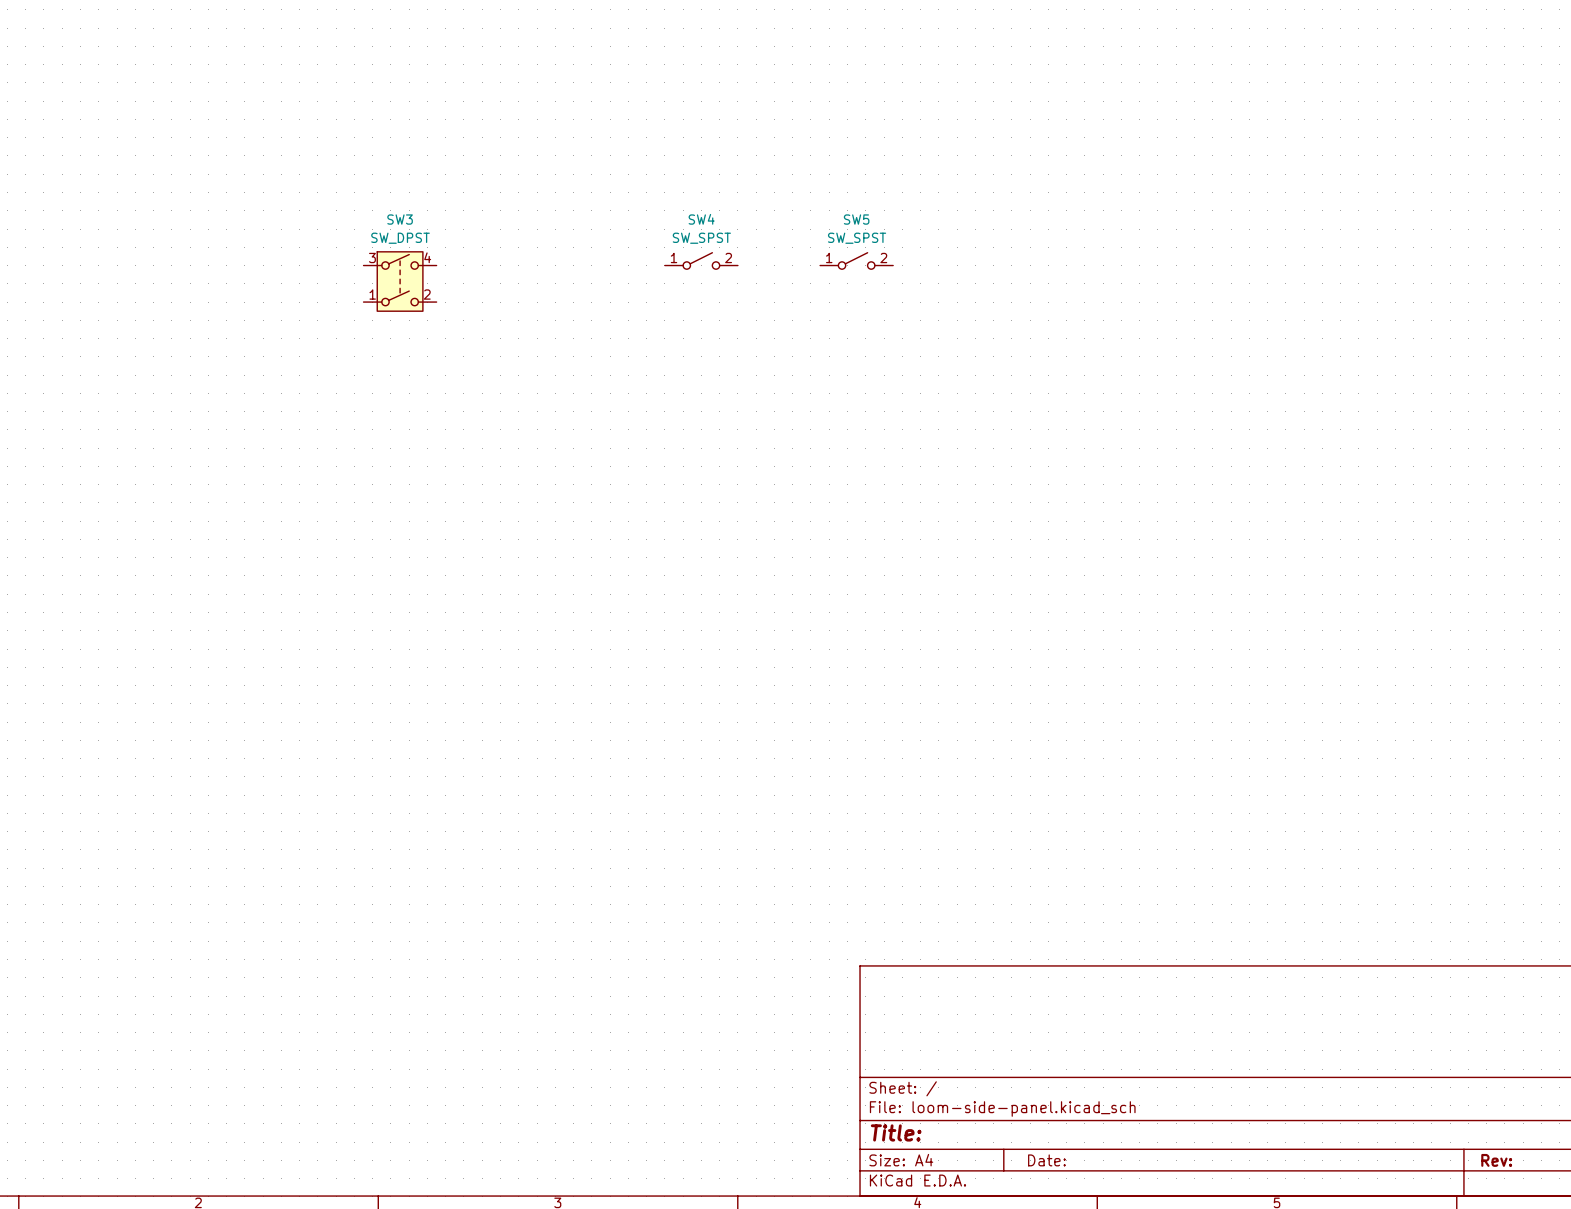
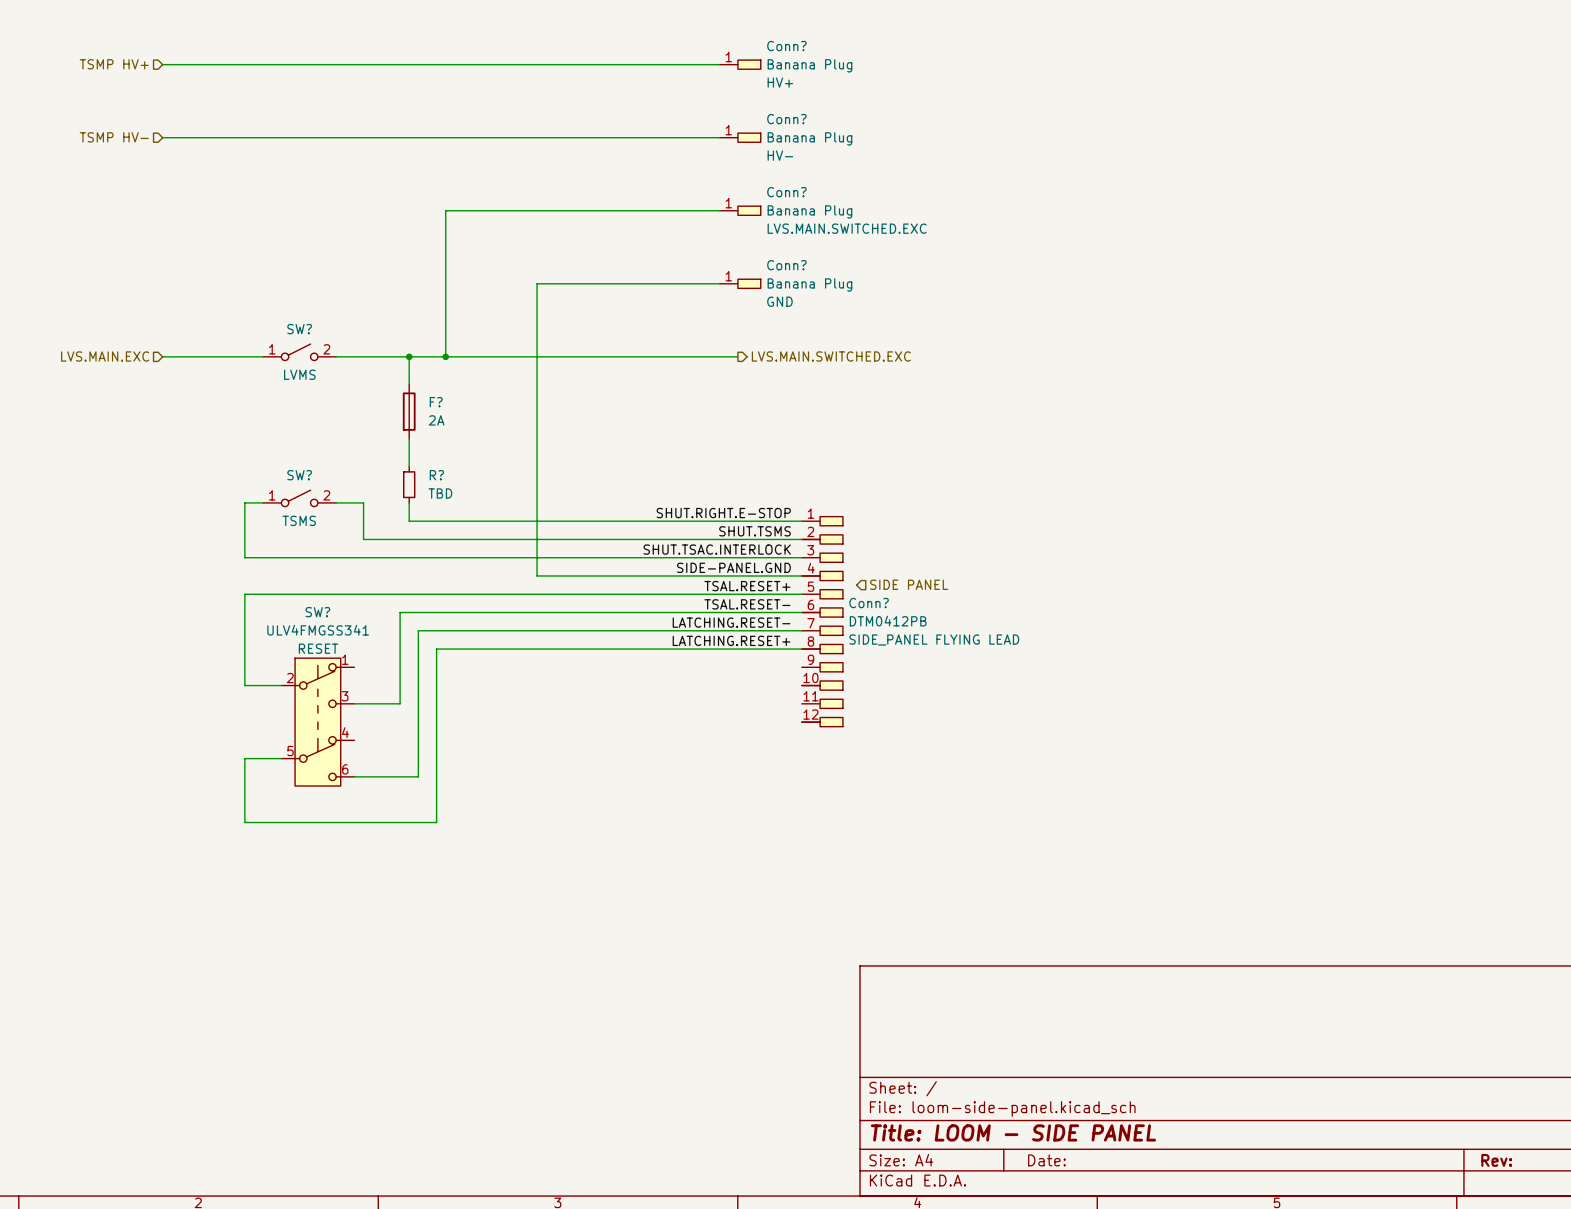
hierarchical label: none -> TSMP HV+ (114, 64)
wire: none -> (162, 64) (719, 64)
Conn?: none -> Banana Plug (740, 64)
hierarchical label: none -> TSMP HV- (114, 137)
wire: none -> (162, 137) (719, 137)
Conn?: none -> Banana Plug (740, 137)
wire: none -> (719, 210) (445, 210) (445, 356)
Conn?: none -> Banana Plug (740, 210)
SW4: SW_SPST (701, 260) -> none
SW5: SW_SPST (856, 260) -> none
SW3: SW_DPST (400, 281) -> none
wire: none -> (719, 283) (537, 283) (537, 575) (801, 575)
Conn?: none -> Banana Plug (740, 283)
SW?: none -> LVMS (299, 352)
hierarchical label: none -> LVS.MAIN.EXC (105, 356)
wire: none -> (162, 356) (263, 356)
wire: none -> (336, 356) (737, 356)
wire: none -> (409, 356) (409, 384)
junction: none -> (409, 356)
junction: none -> (445, 356)
hierarchical label: none -> LVS.MAIN.SWITCHED.EXC (831, 356)
F?: none -> 2A (409, 411)
wire: none -> (409, 439) (409, 466)
R?: none -> TBD (409, 484)
SW?: none -> TSMS (299, 498)
wire: none -> (263, 502) (244, 502) (244, 557) (801, 557)
wire: none -> (336, 502) (363, 502) (363, 539) (801, 539)
wire: none -> (409, 502) (409, 521) (801, 521)
label: none -> SHUT.RIGHT.E-STOP (723, 513)
label: none -> SHUT.TSMS (755, 531)
label: none -> SHUT.TSAC.INTERLOCK (717, 549)
label: none -> SIDE-PANEL.GND (733, 567)
hierarchical label: none -> SIDE PANEL (909, 584)
label: none -> TSAL.RESET+ (747, 586)
wire: none -> (801, 594) (244, 594) (244, 685) (281, 685)
label: none -> TSAL.RESET- (747, 604)
wire: none -> (801, 612) (400, 612) (400, 703) (354, 703)
Conn?: none -> (822, 621)
label: none -> LATCHING.RESET- (731, 622)
wire: none -> (801, 630) (418, 630) (418, 776) (354, 776)
label: none -> LATCHING.RESET+ (731, 640)
wire: none -> (801, 649) (436, 649) (436, 822) (244, 822) (244, 758) (281, 758)
SW?: none -> ULV4FMGSS341 (317, 722)
title block: Title: (896, 1132) -> Title: LOOM - SIDE PANEL (1013, 1132)

